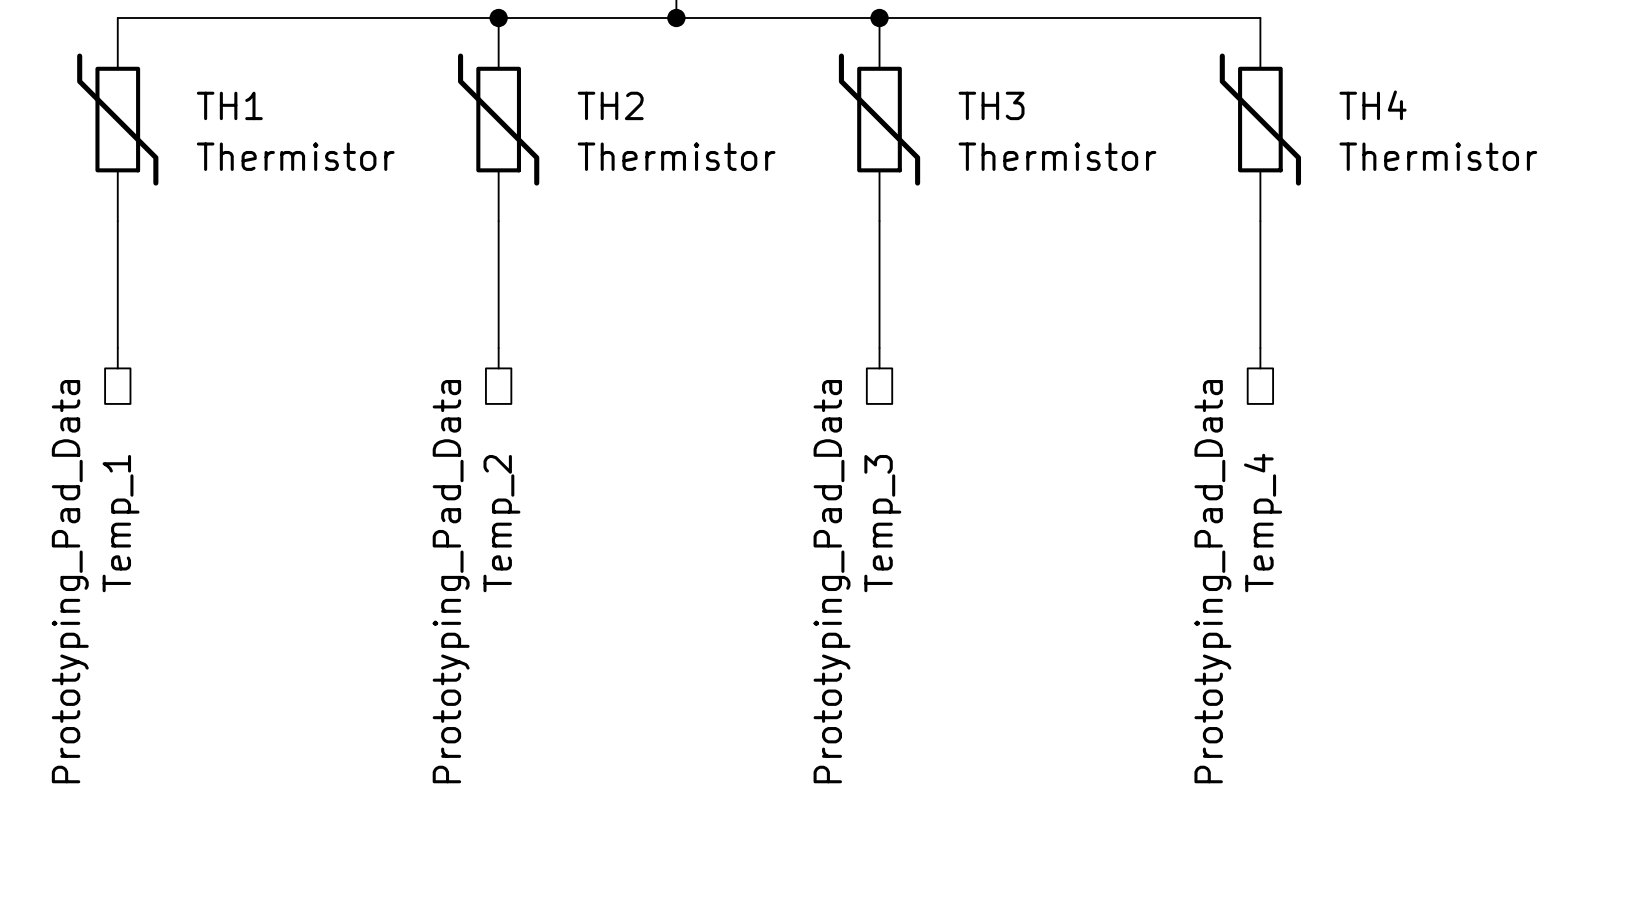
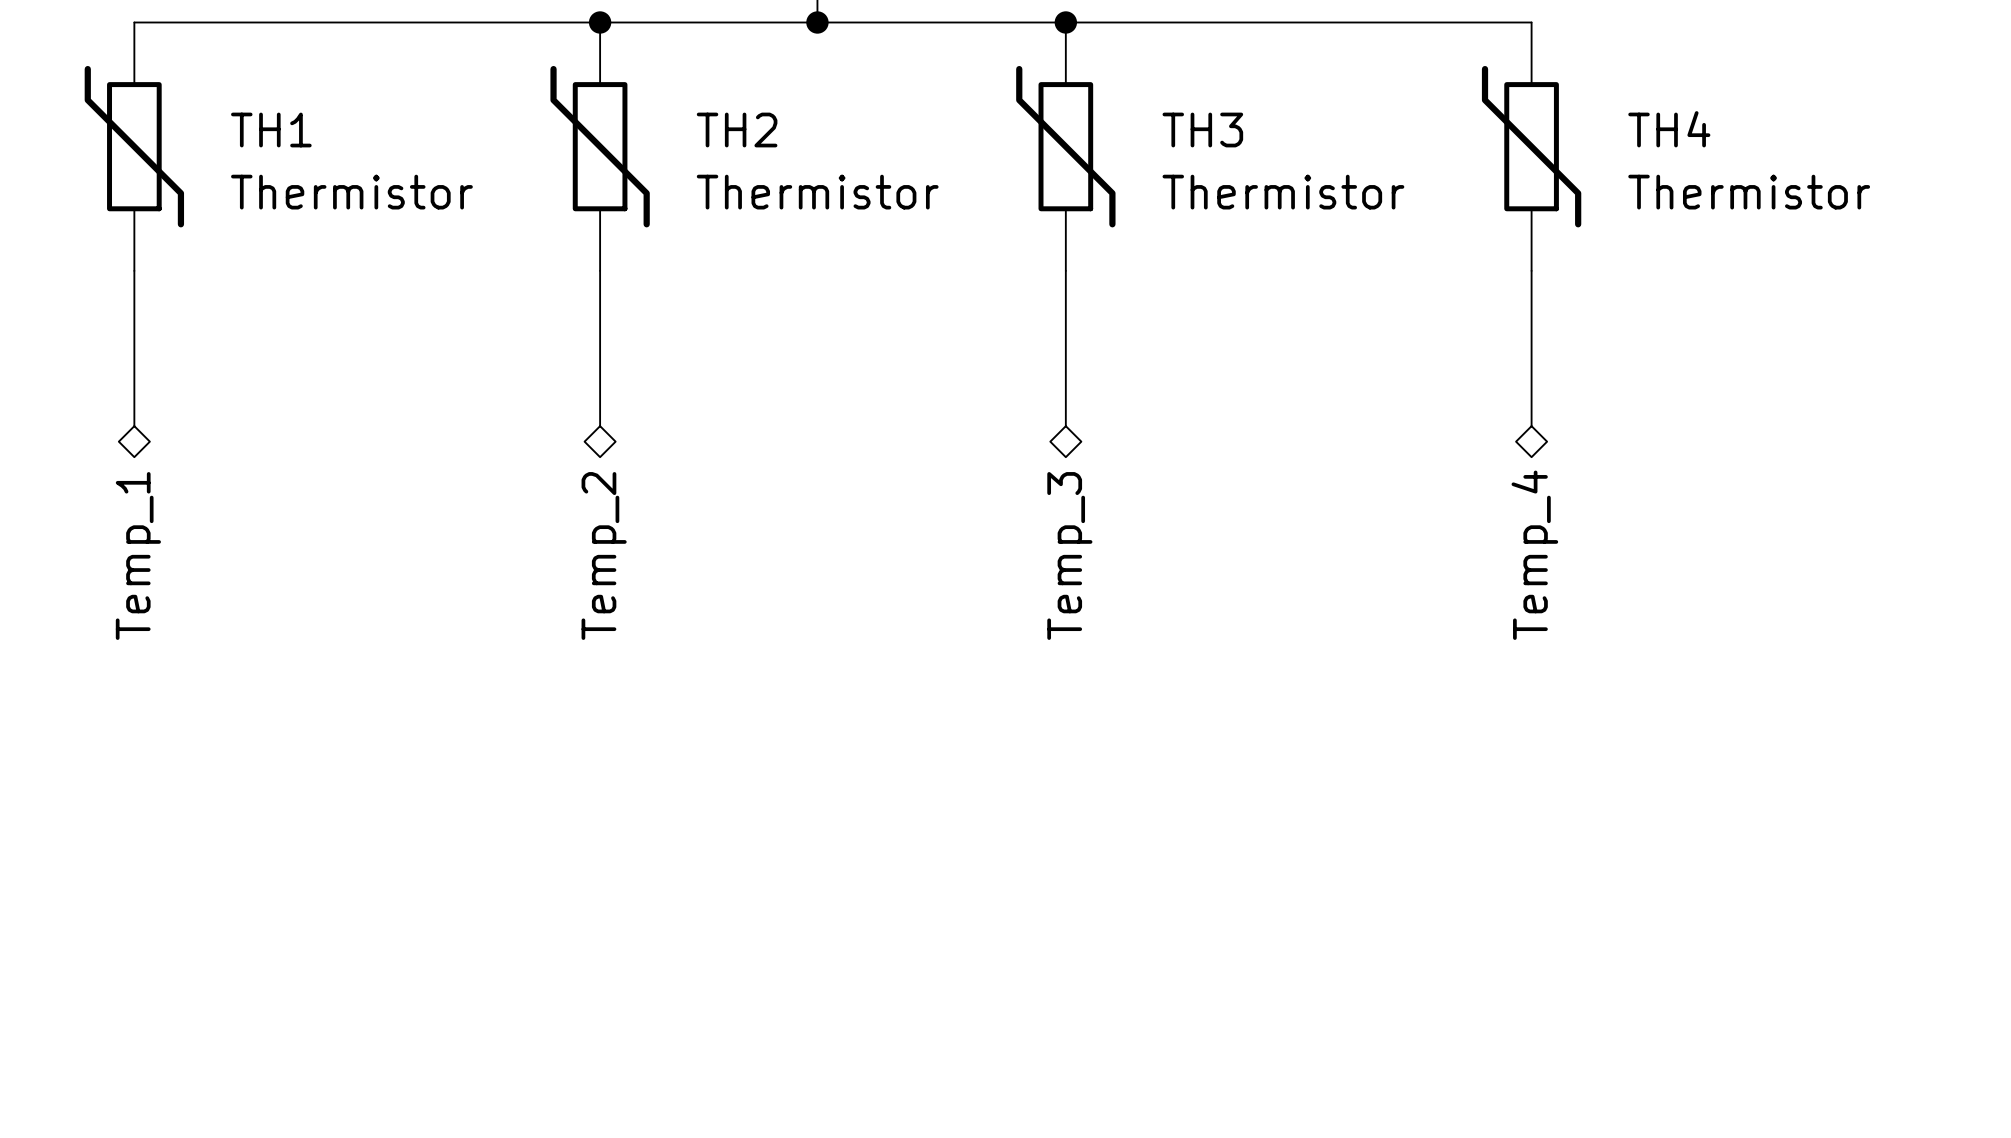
Temp_1: Prototyping_Pad_Data (117, 376) -> none
Temp_2: Prototyping_Pad_Data (498, 376) -> none
Temp_3: Prototyping_Pad_Data (879, 376) -> none
Temp_4: Prototyping_Pad_Data (1260, 376) -> none
hierarchical label: none -> Temp_4 (1534, 555)
hierarchical label: none -> Temp_1 (138, 555)
hierarchical label: none -> Temp_2 (604, 555)
hierarchical label: none -> Temp_3 (1069, 555)

